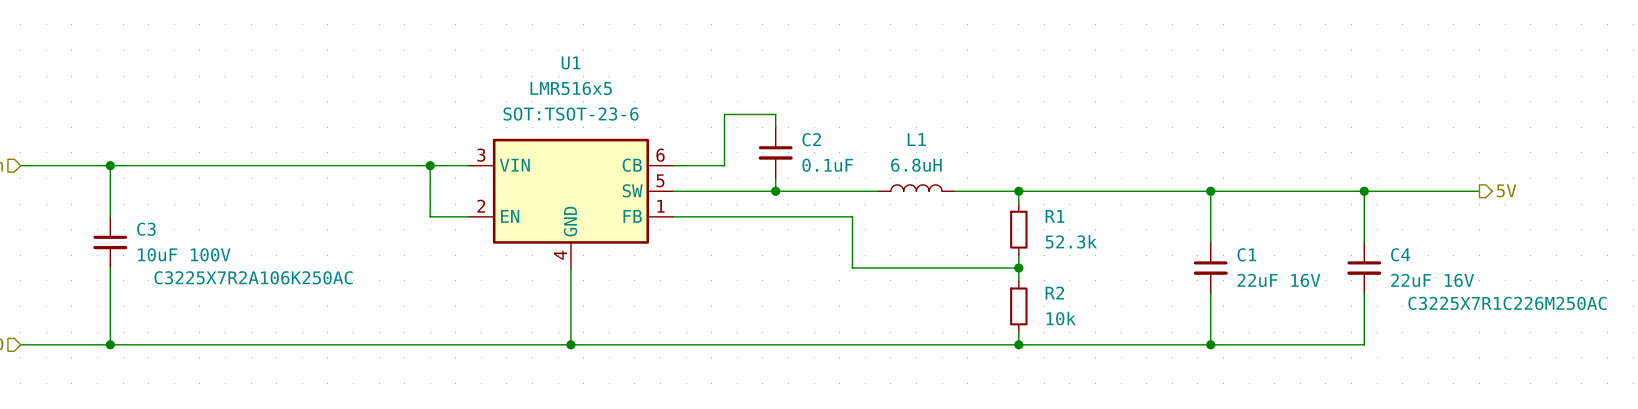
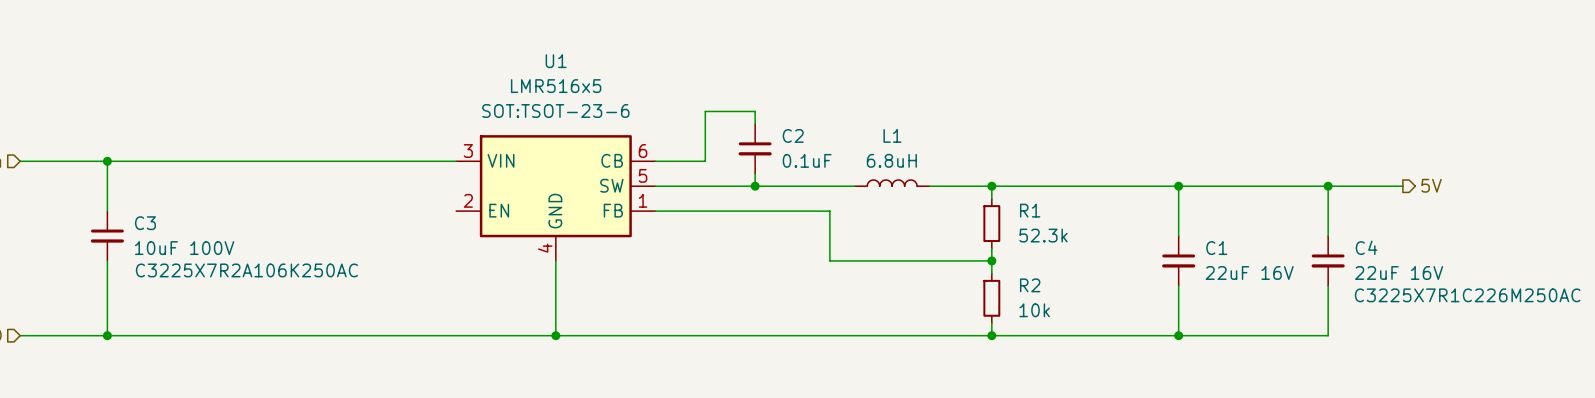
wire: (430, 165) (430, 216) (468, 216) -> none
junction: (430, 165) -> none
hierarchical label position: 5V (1506, 190) -> 5V (1431, 185)
wire: (1441, 191) (1479, 191) -> none

